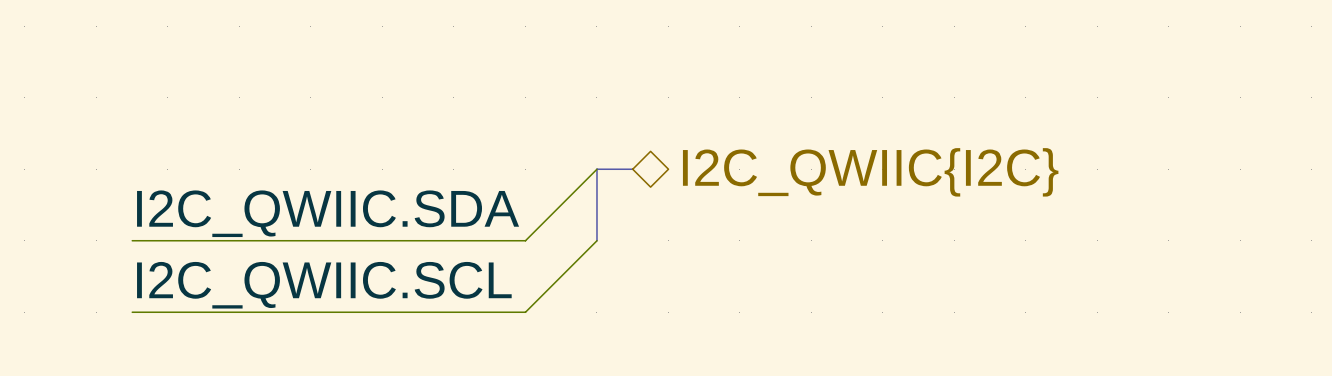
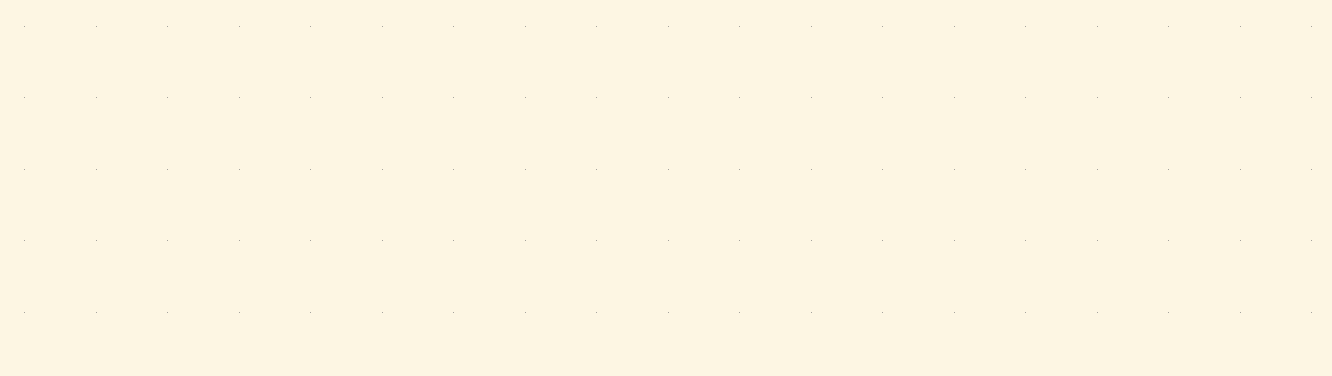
wire: (596, 169) (525, 240) (132, 240) -> none
bus: (632, 169) (596, 169) (596, 240) -> none
hierarchical label: I2C_QWIIC{I2C} (870, 172) -> none
label: I2C_QWIIC.SDA (328, 213) -> none
wire: (596, 240) (525, 312) (132, 312) -> none
label: I2C_QWIIC.SCL (324, 285) -> none

